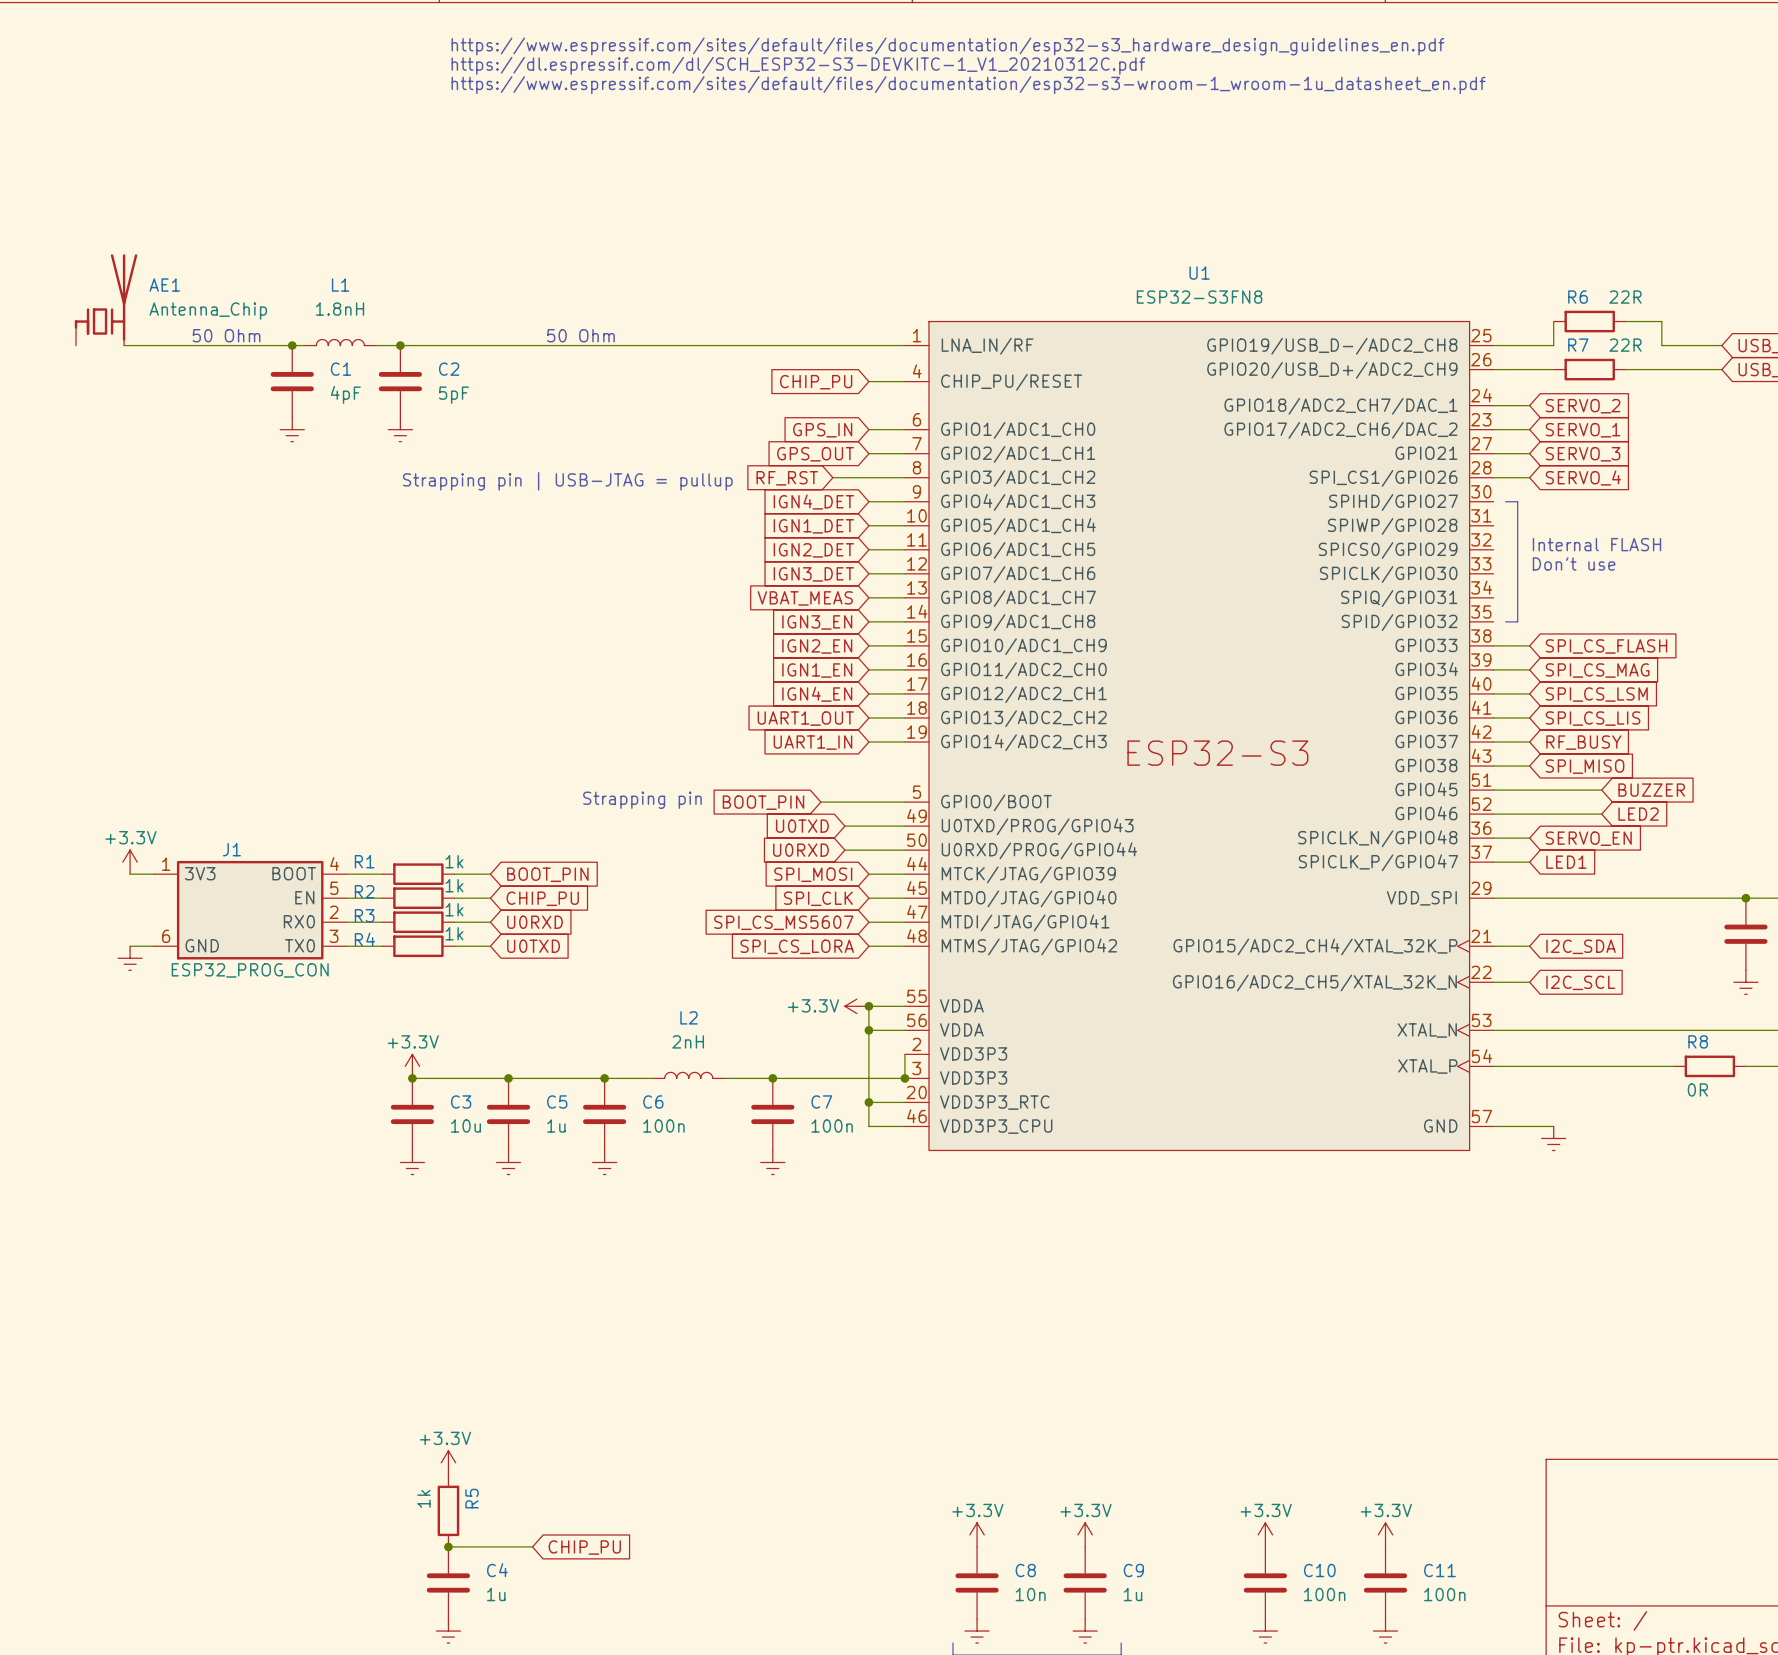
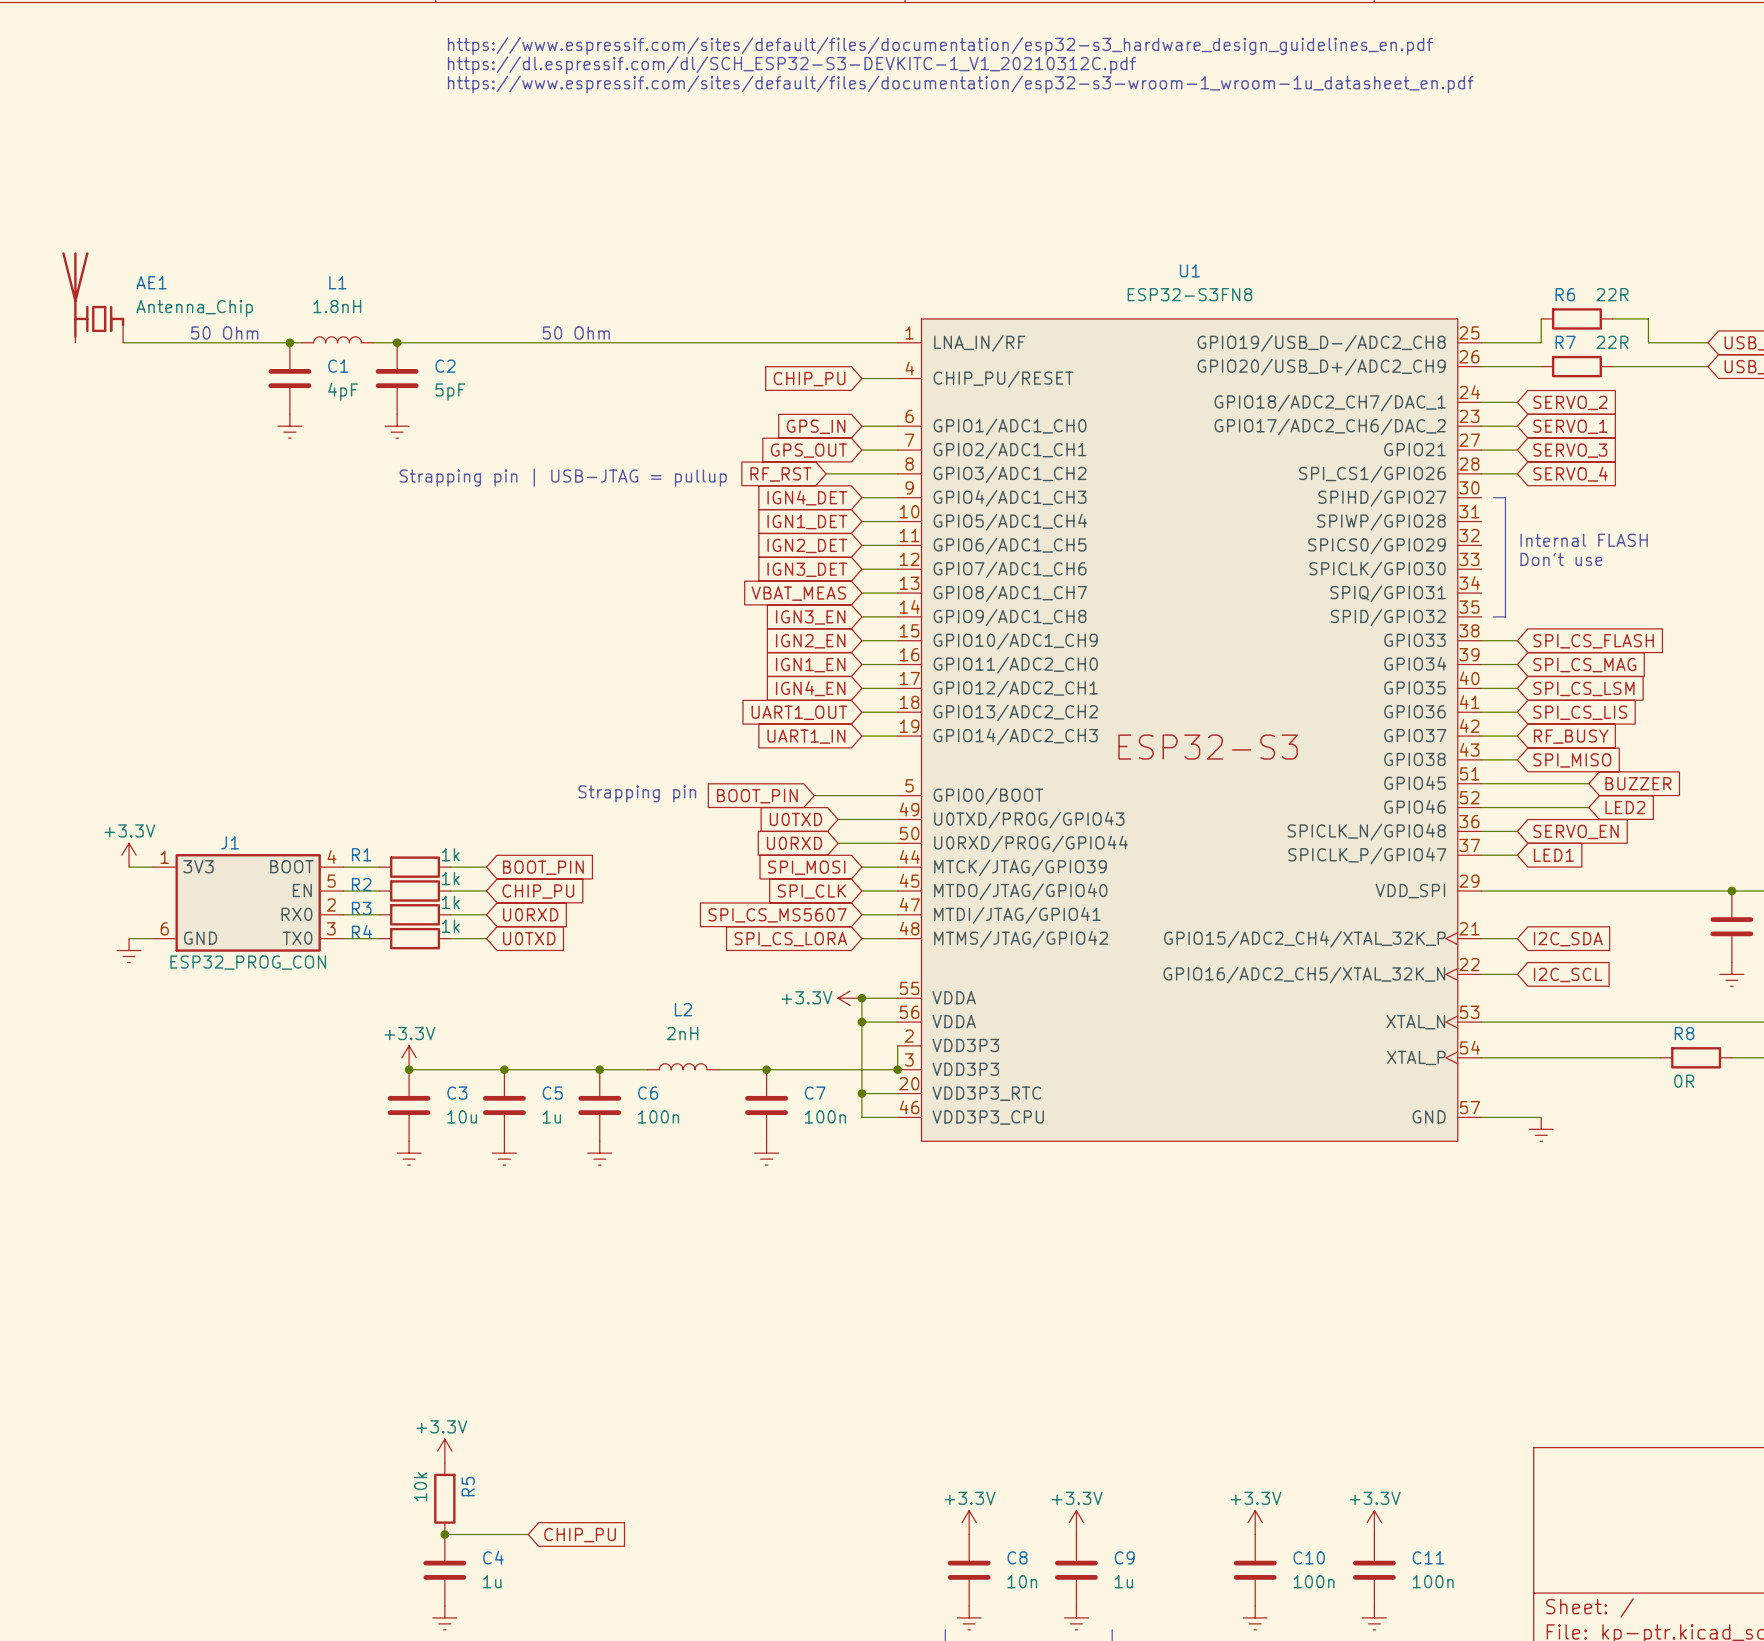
AE1 flip: as is (106, 297) -> left-right (93, 295)
R5 value: 1k (423, 1498) -> 10k (420, 1486)

